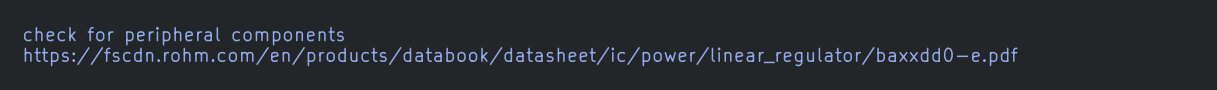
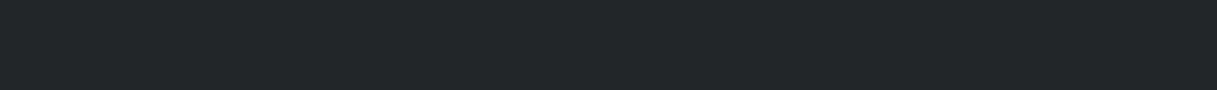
text: check for peripheral components (184, 36) -> none
text: https://fscdn.rohm.com/en/products/databook/datasheet/ic/power/linear_regulator/baxxdd0-e.pdf (521, 56) -> none

